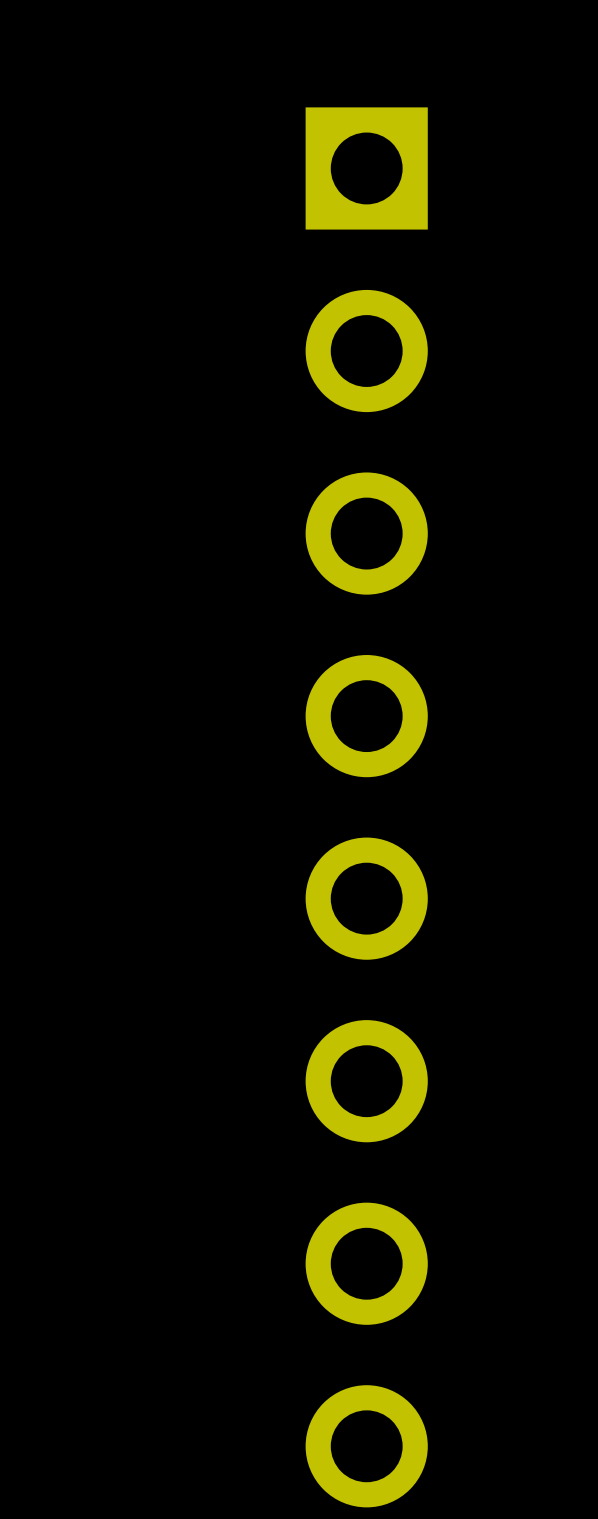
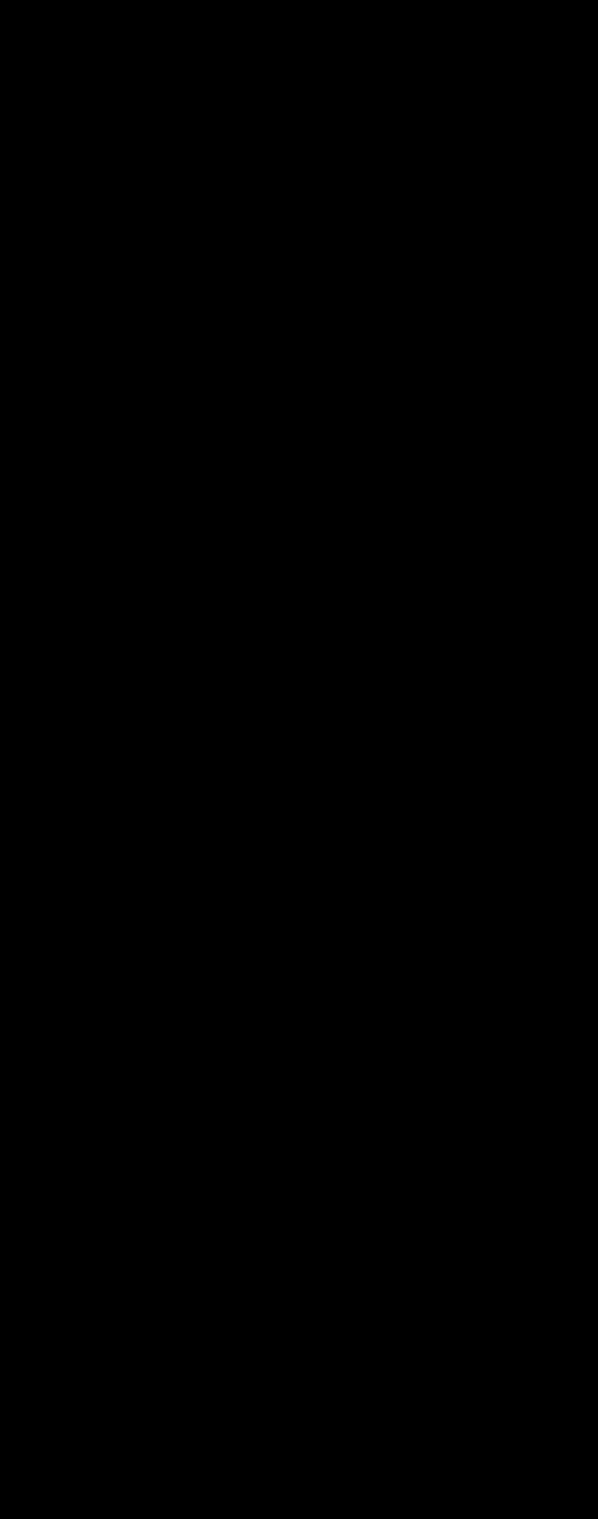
part: (366, 807) -> none

